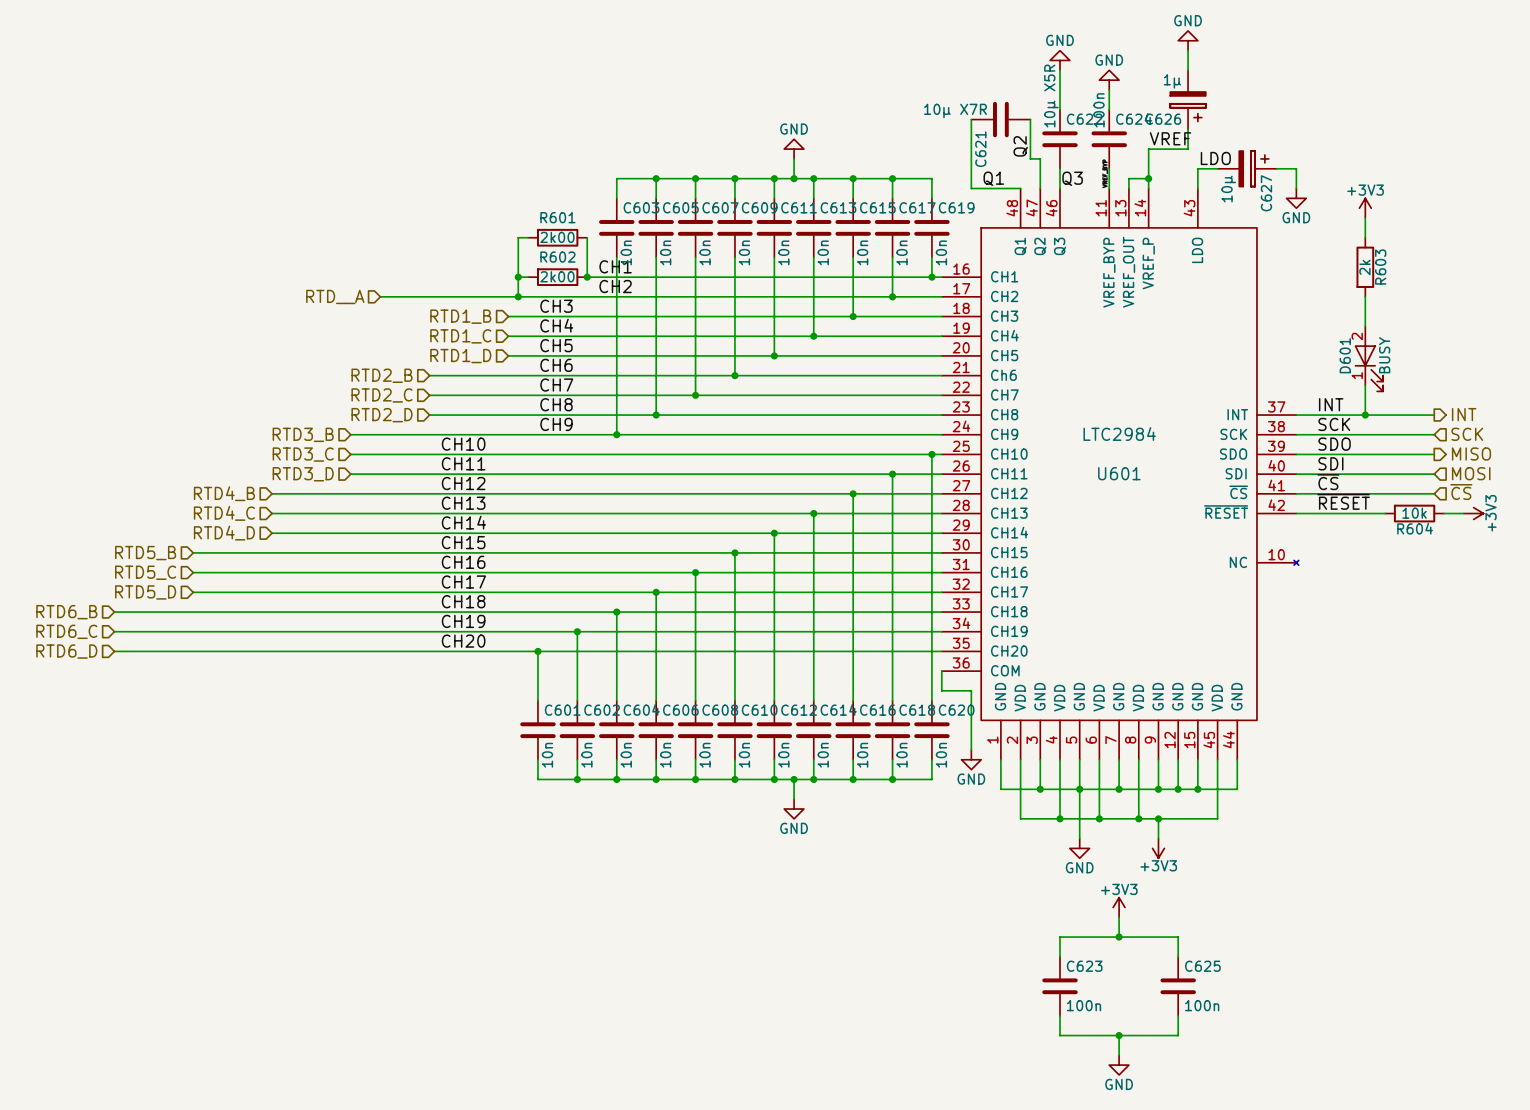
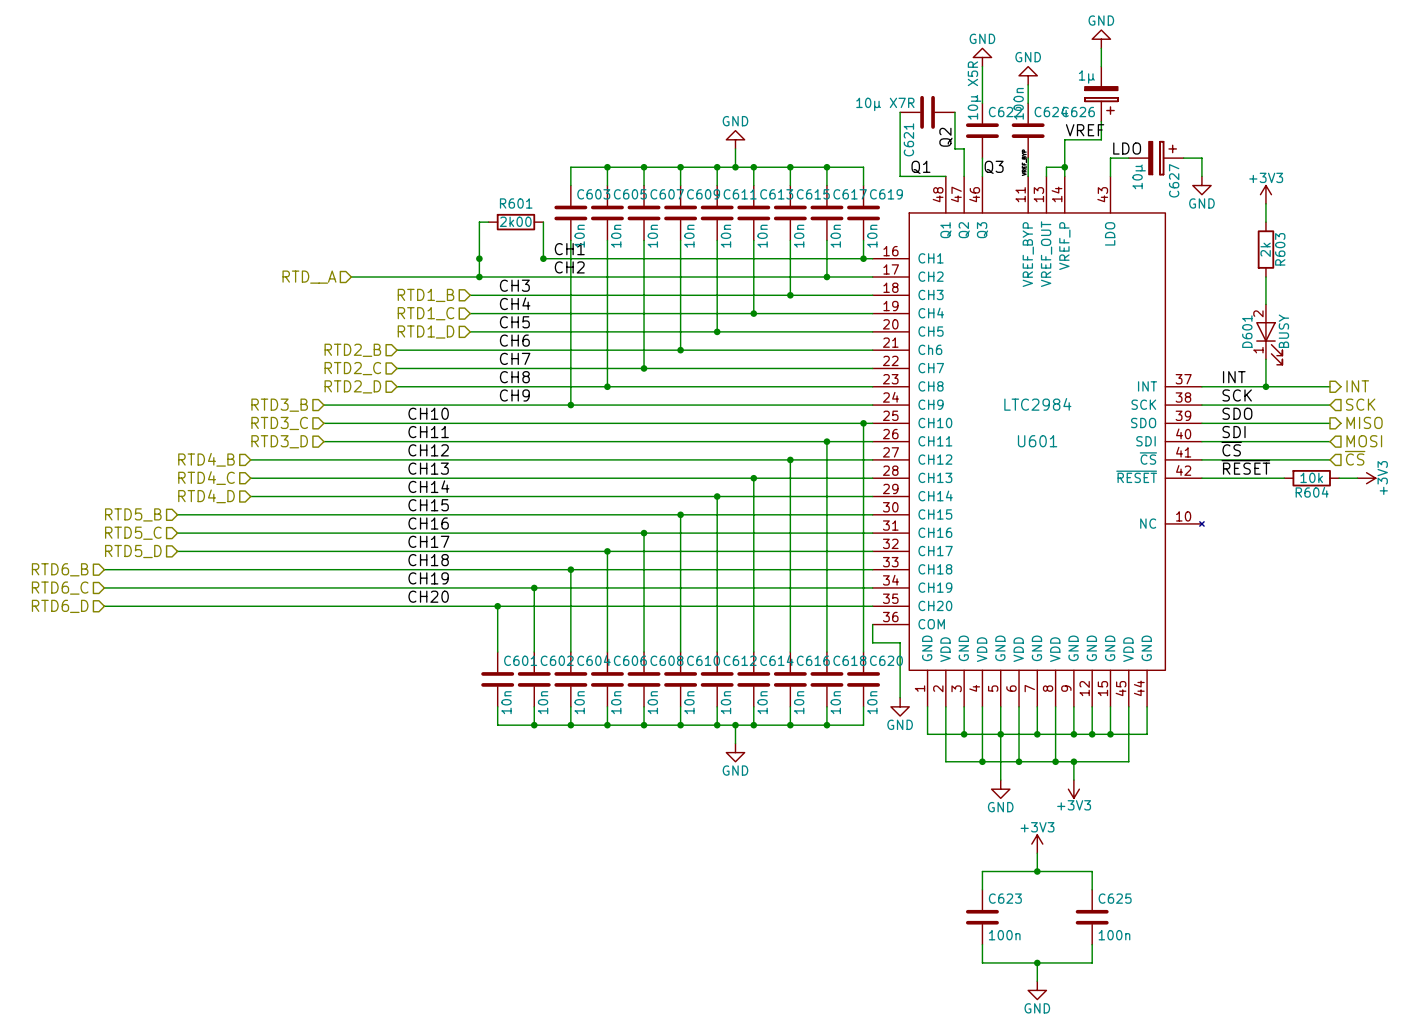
wire: (518, 277) (528, 277) -> none
R602: 2k00 (557, 277) -> none

